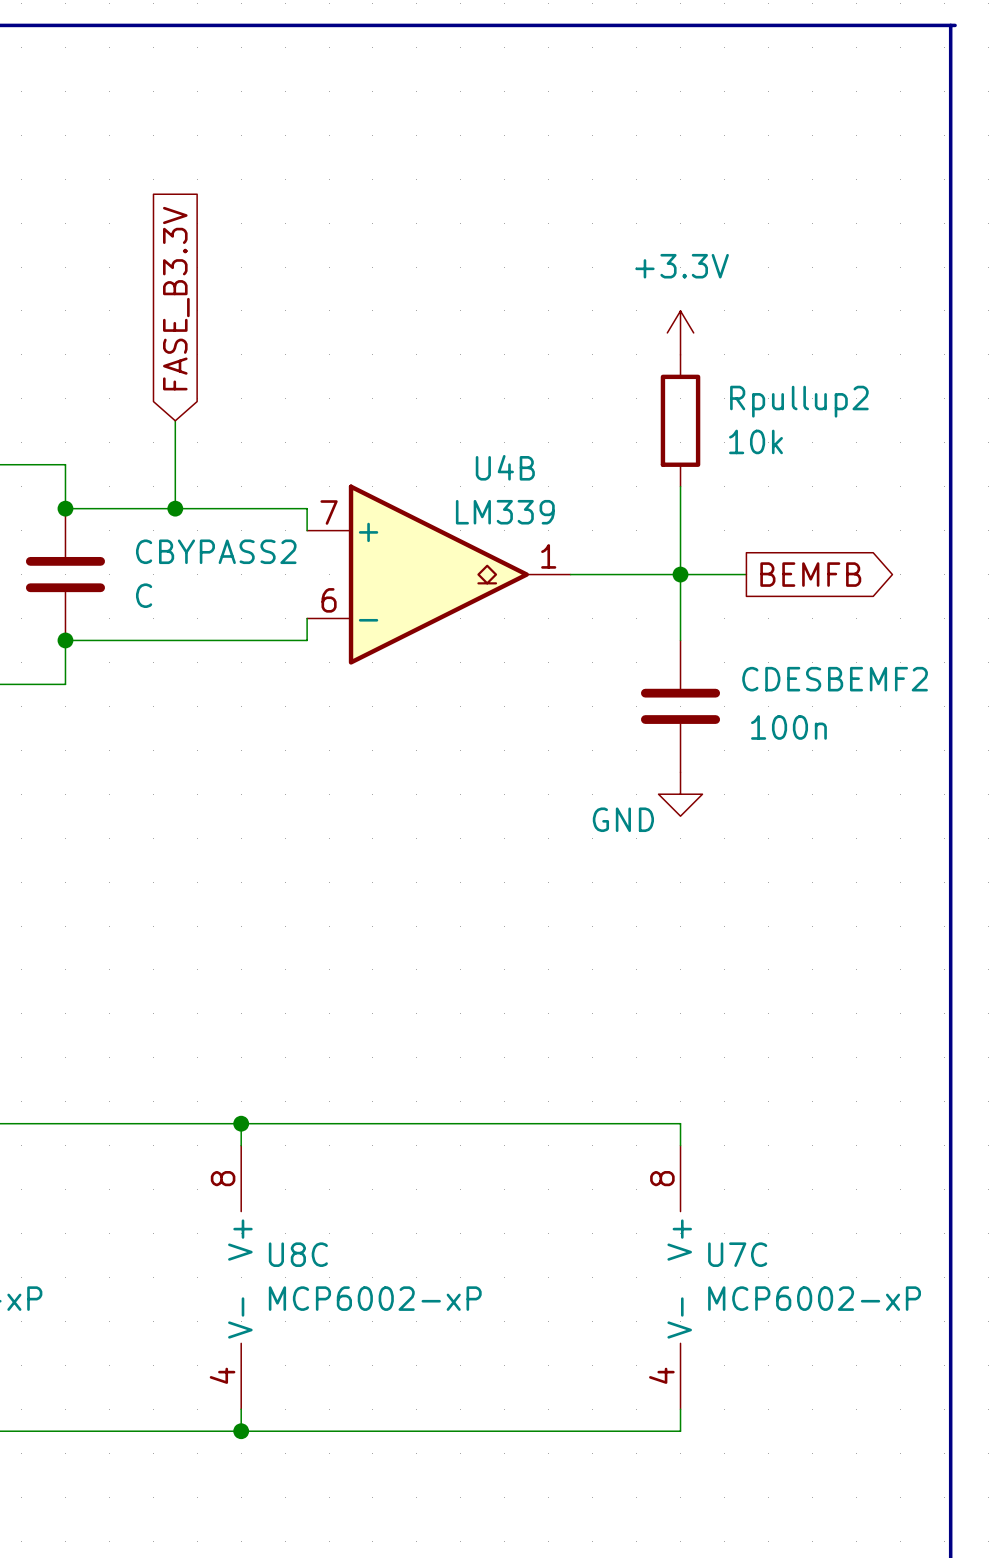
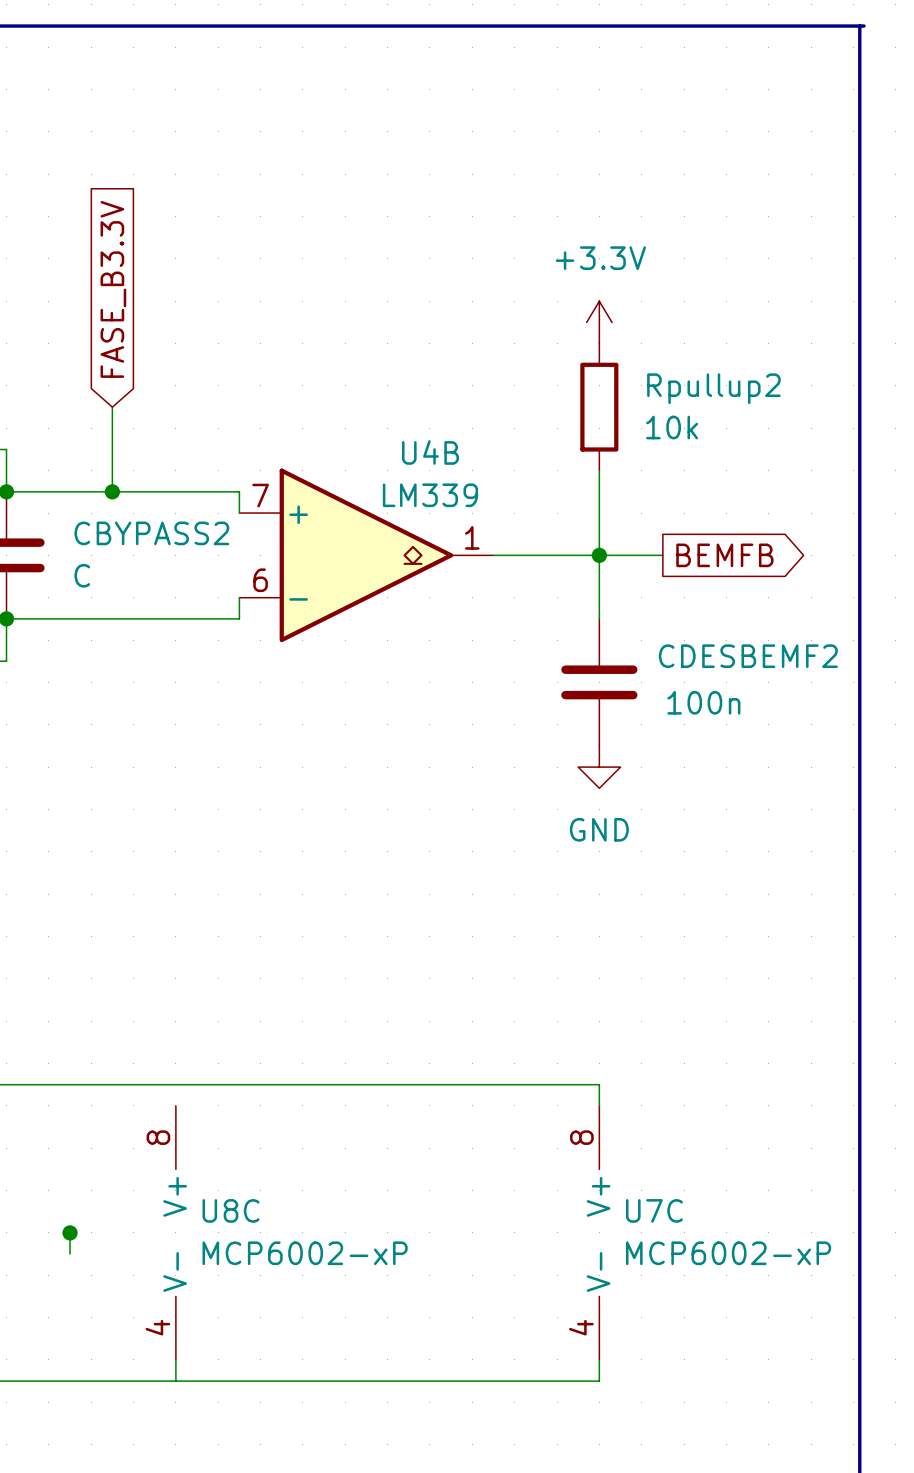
power symbol text position: GND (623, 819) -> GND (599, 829)
wire: (241, 1123) (241, 1145) -> (70, 1232) (70, 1254)
junction: (241, 1123) -> none
junction: none -> (70, 1232)
junction: (241, 1431) -> none

